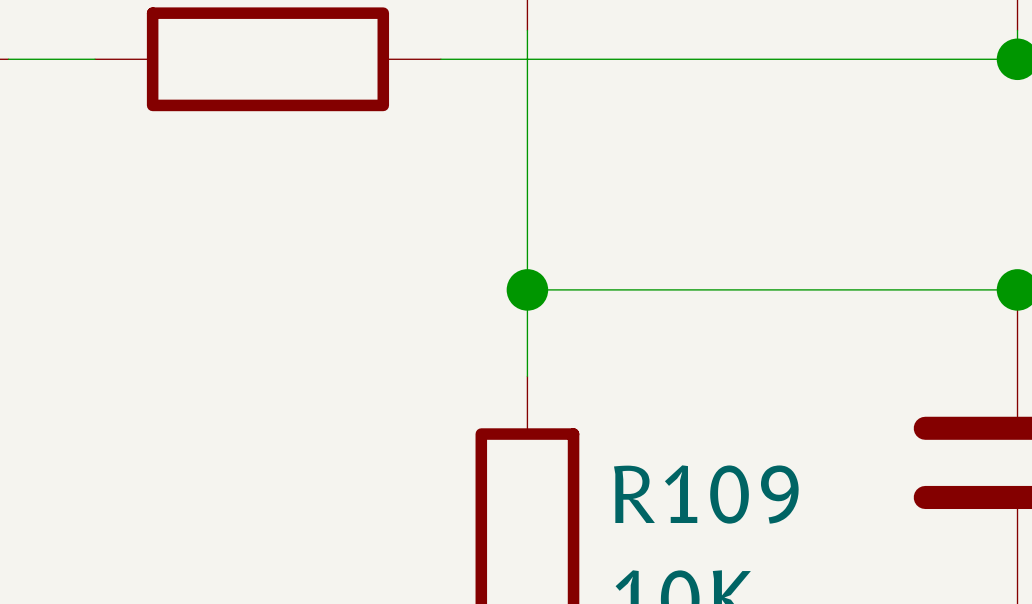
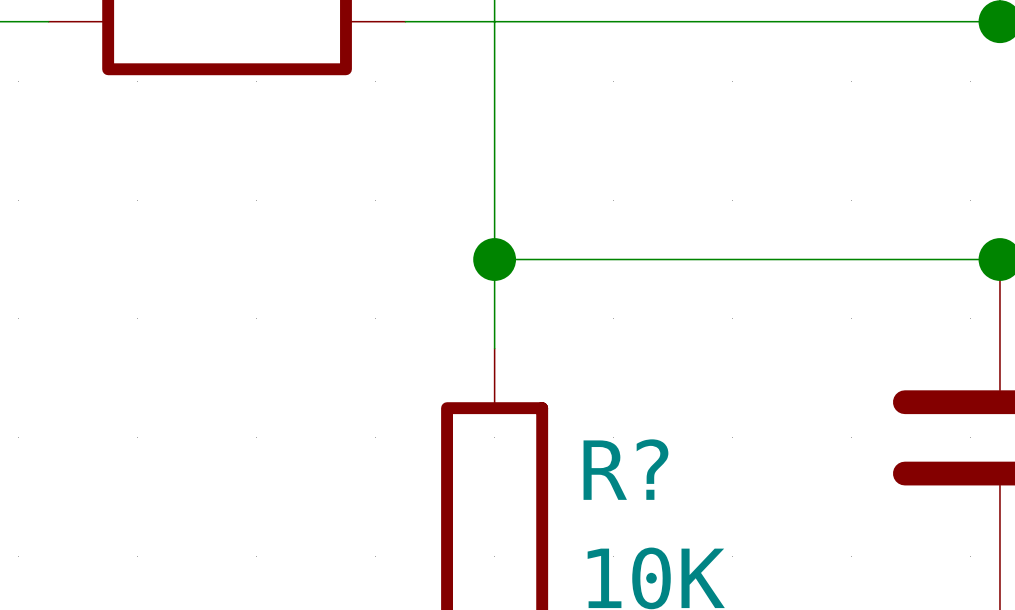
R109 name: R109 (706, 494) -> R? (625, 469)

